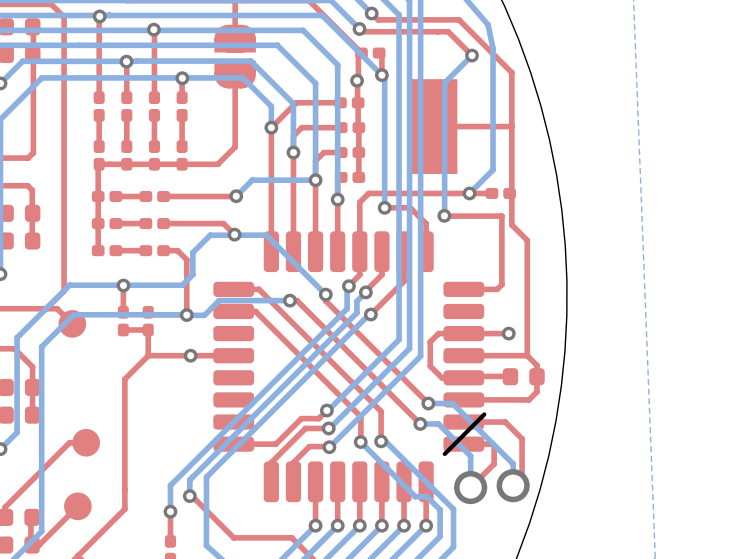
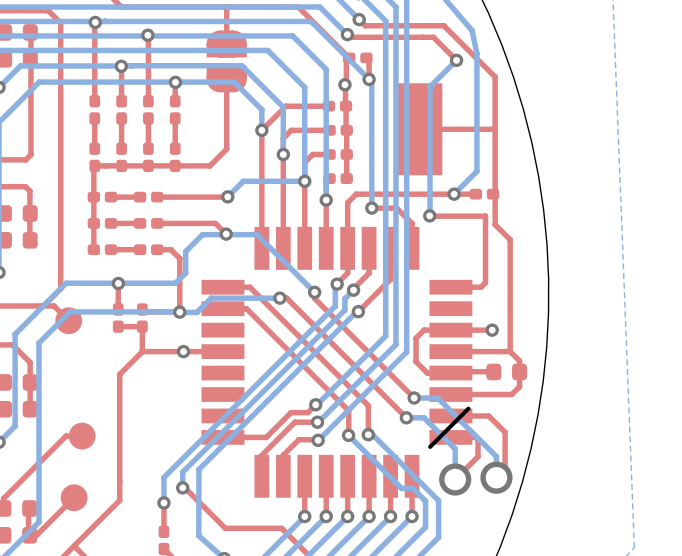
part footprint: [213, 231, 485, 503] -> [201, 226, 473, 498]

